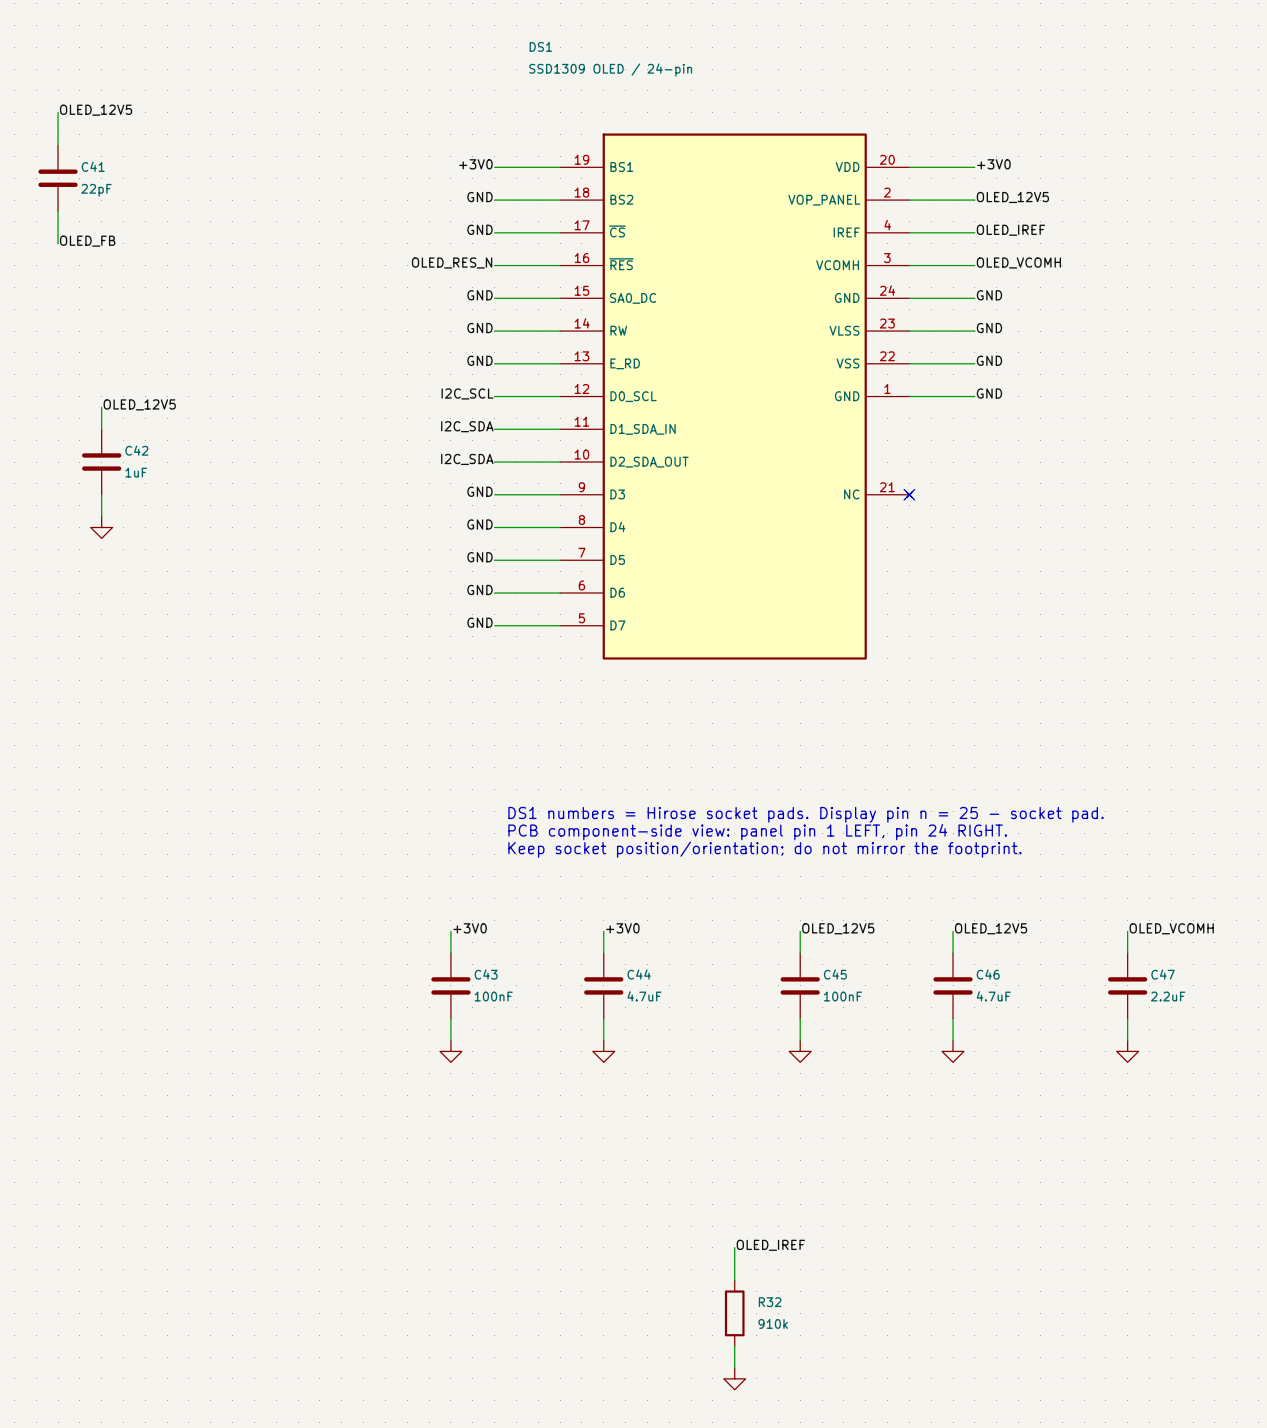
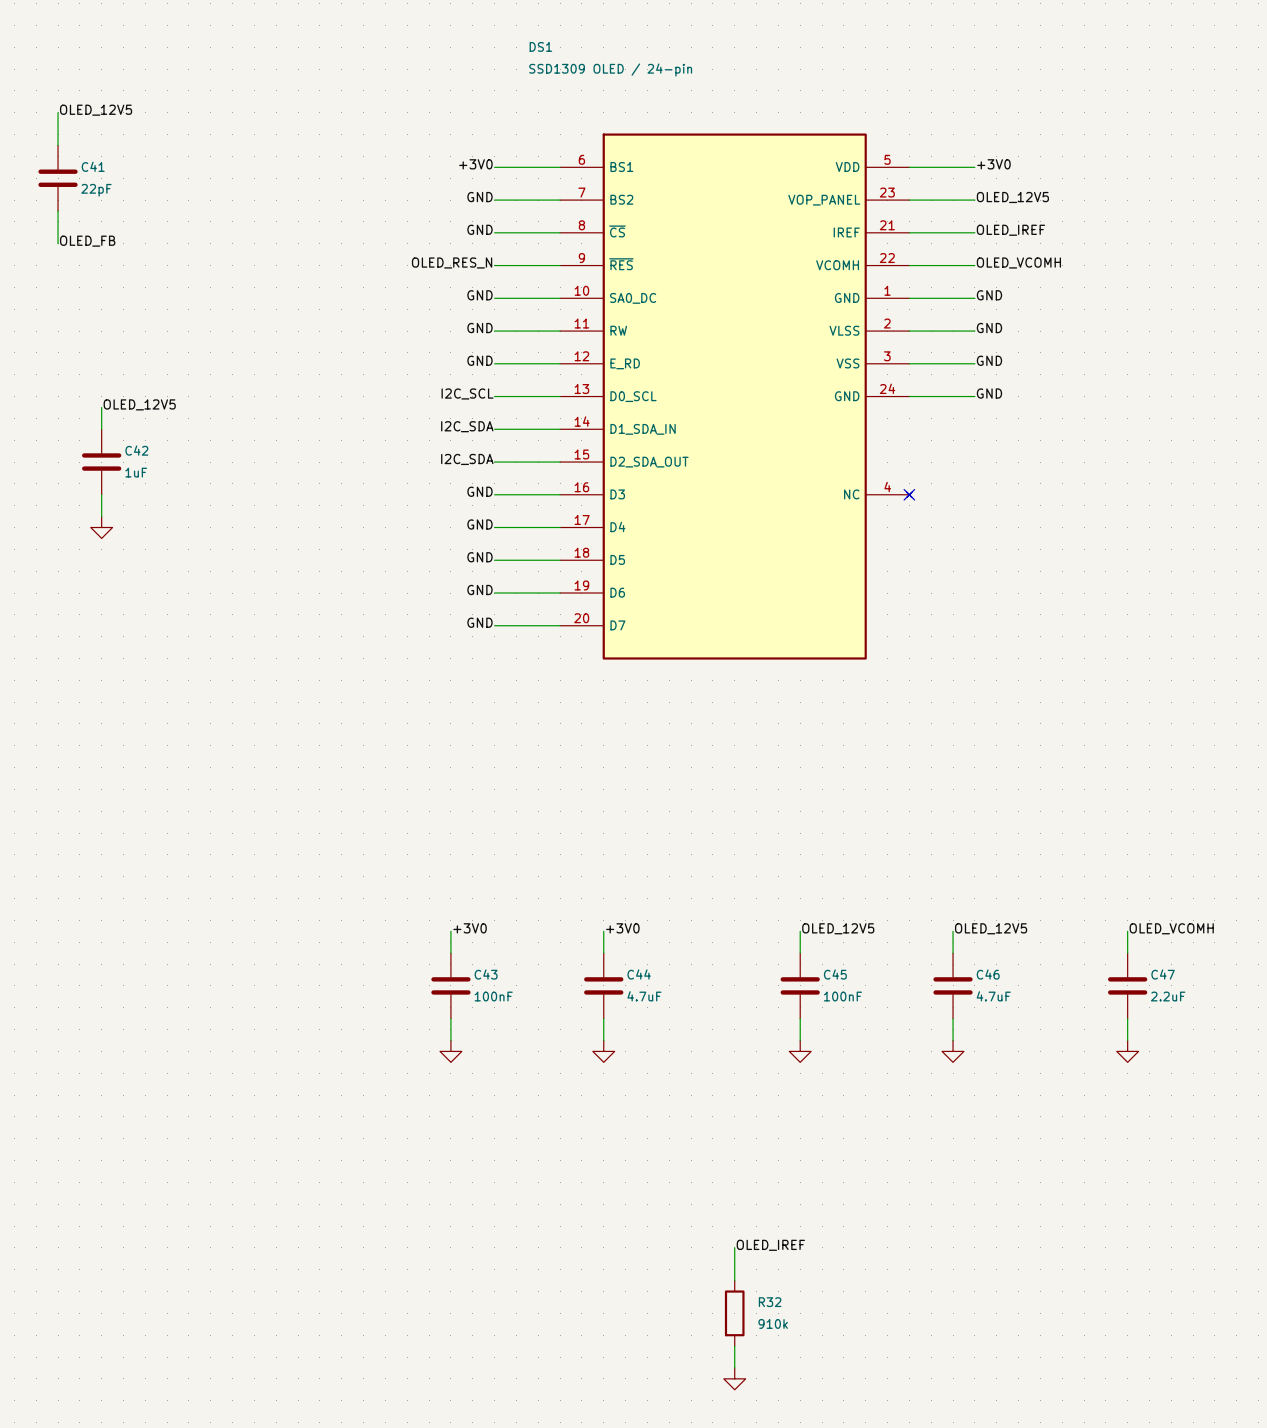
DS1 symbol: [560, 133, 912, 660] -> [560, 133, 912, 660]
text: DS1 numbers = Hirose socket pads. Display pin n = 25 - socket pad. (806, 814) -> none
text: PCB component-side view: panel pin 1 LEFT, pin 24 RIGHT. (757, 832) -> none
text: Keep socket position/orientation; do not mirror the footprint. (764, 849) -> none

